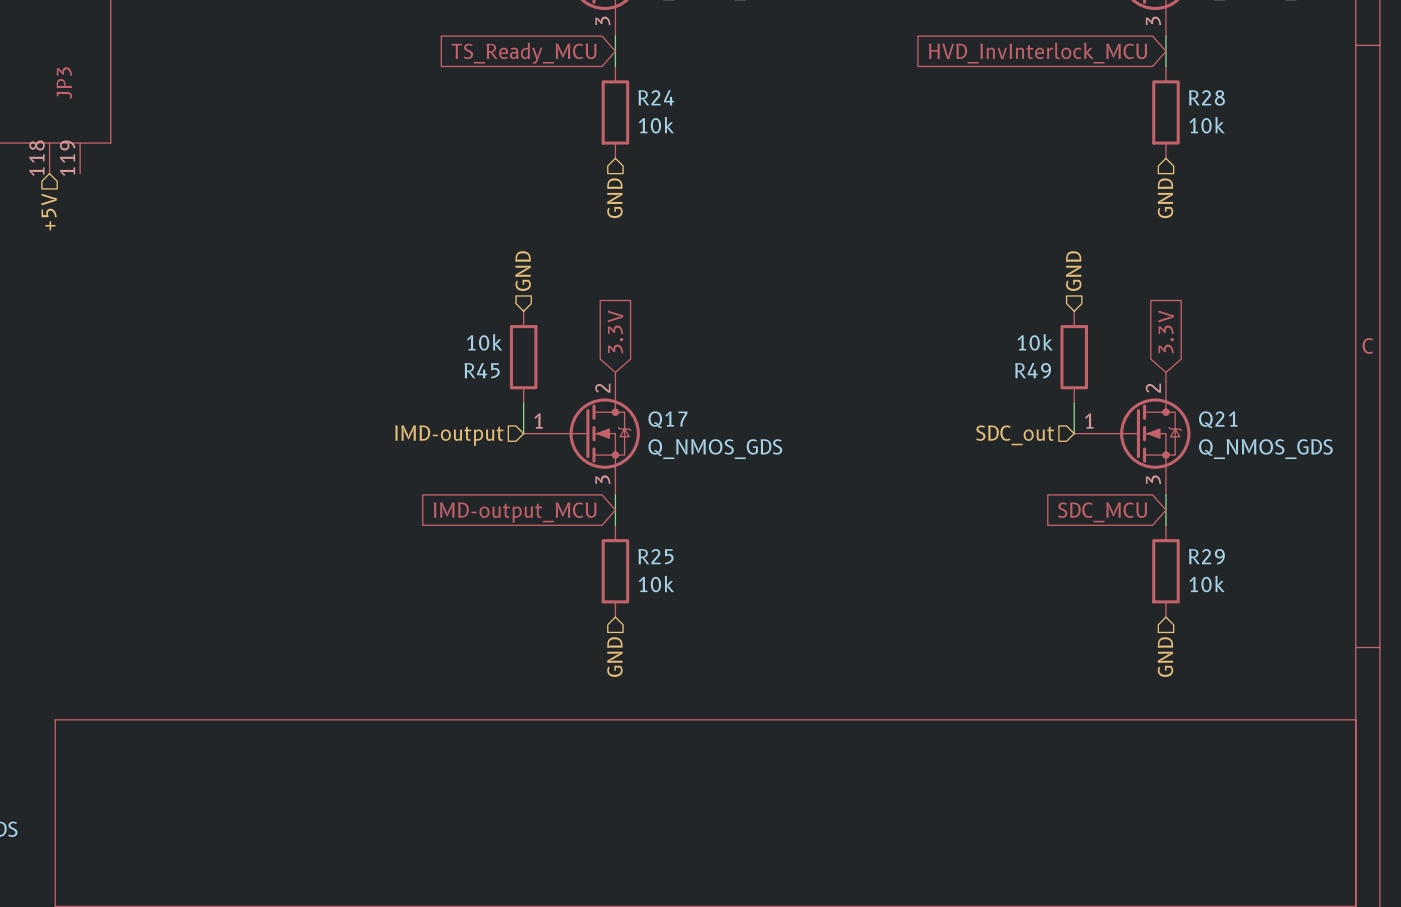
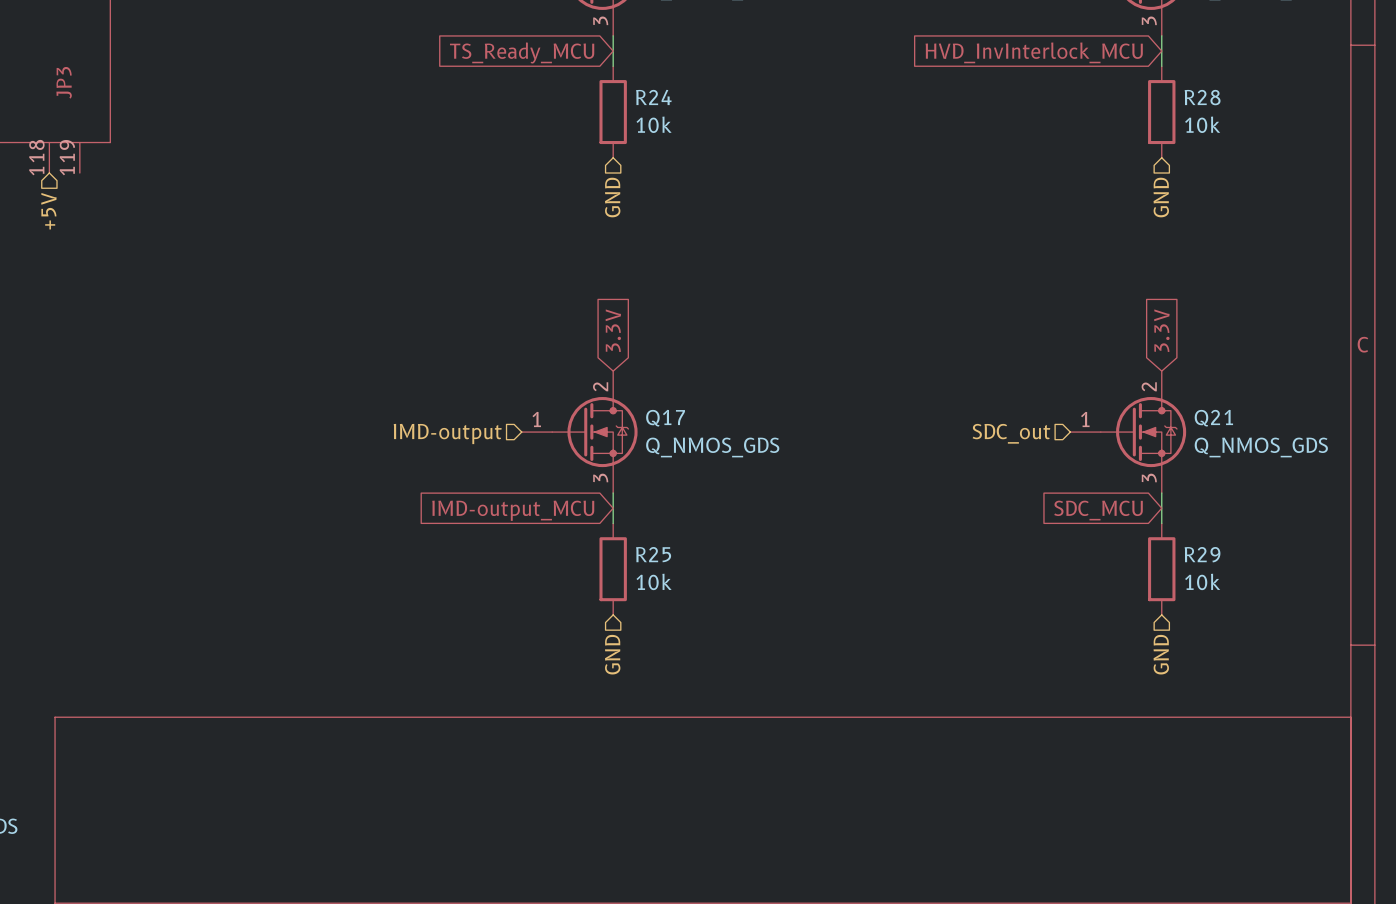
hierarchical label: GND (523, 271) -> none
hierarchical label: GND (1073, 271) -> none
R45: 10k (523, 357) -> none
R49: 10k (1074, 357) -> none
wire: (523, 403) (523, 433) -> none
wire: (1074, 403) (1074, 433) -> none

